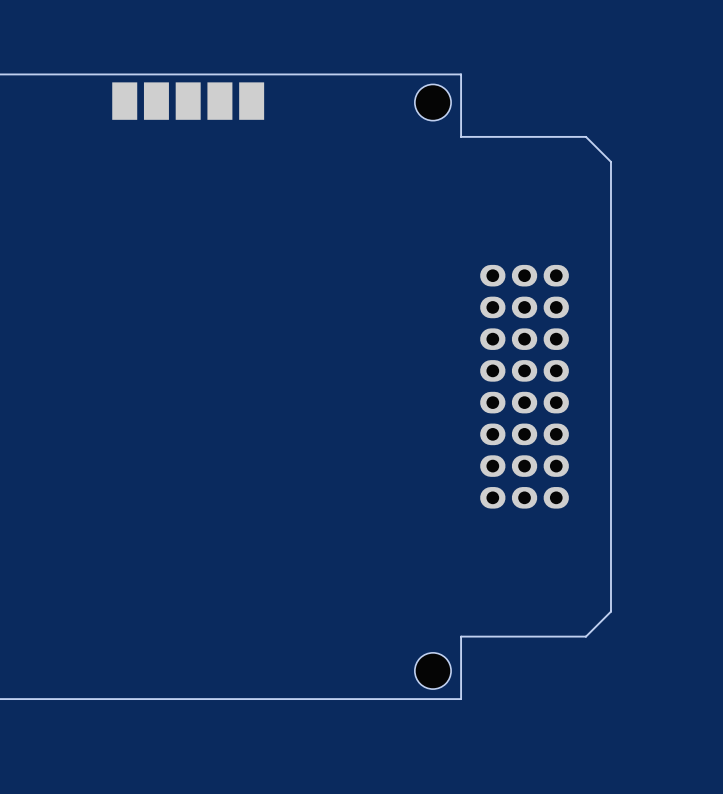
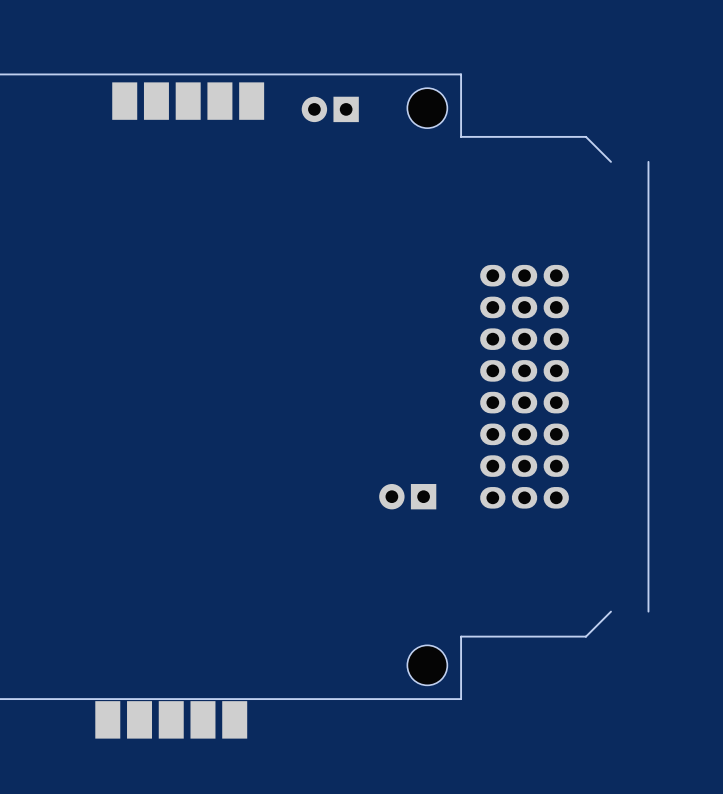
part footprint: [414, 84, 452, 121] -> [407, 88, 448, 129]
part: none -> (330, 109)
board edge: (610, 161) (610, 611) -> (648, 161) (648, 611)
part: none -> (407, 496)
part footprint: [414, 652, 452, 690] -> [407, 645, 448, 686]
part: none -> (171, 719)

